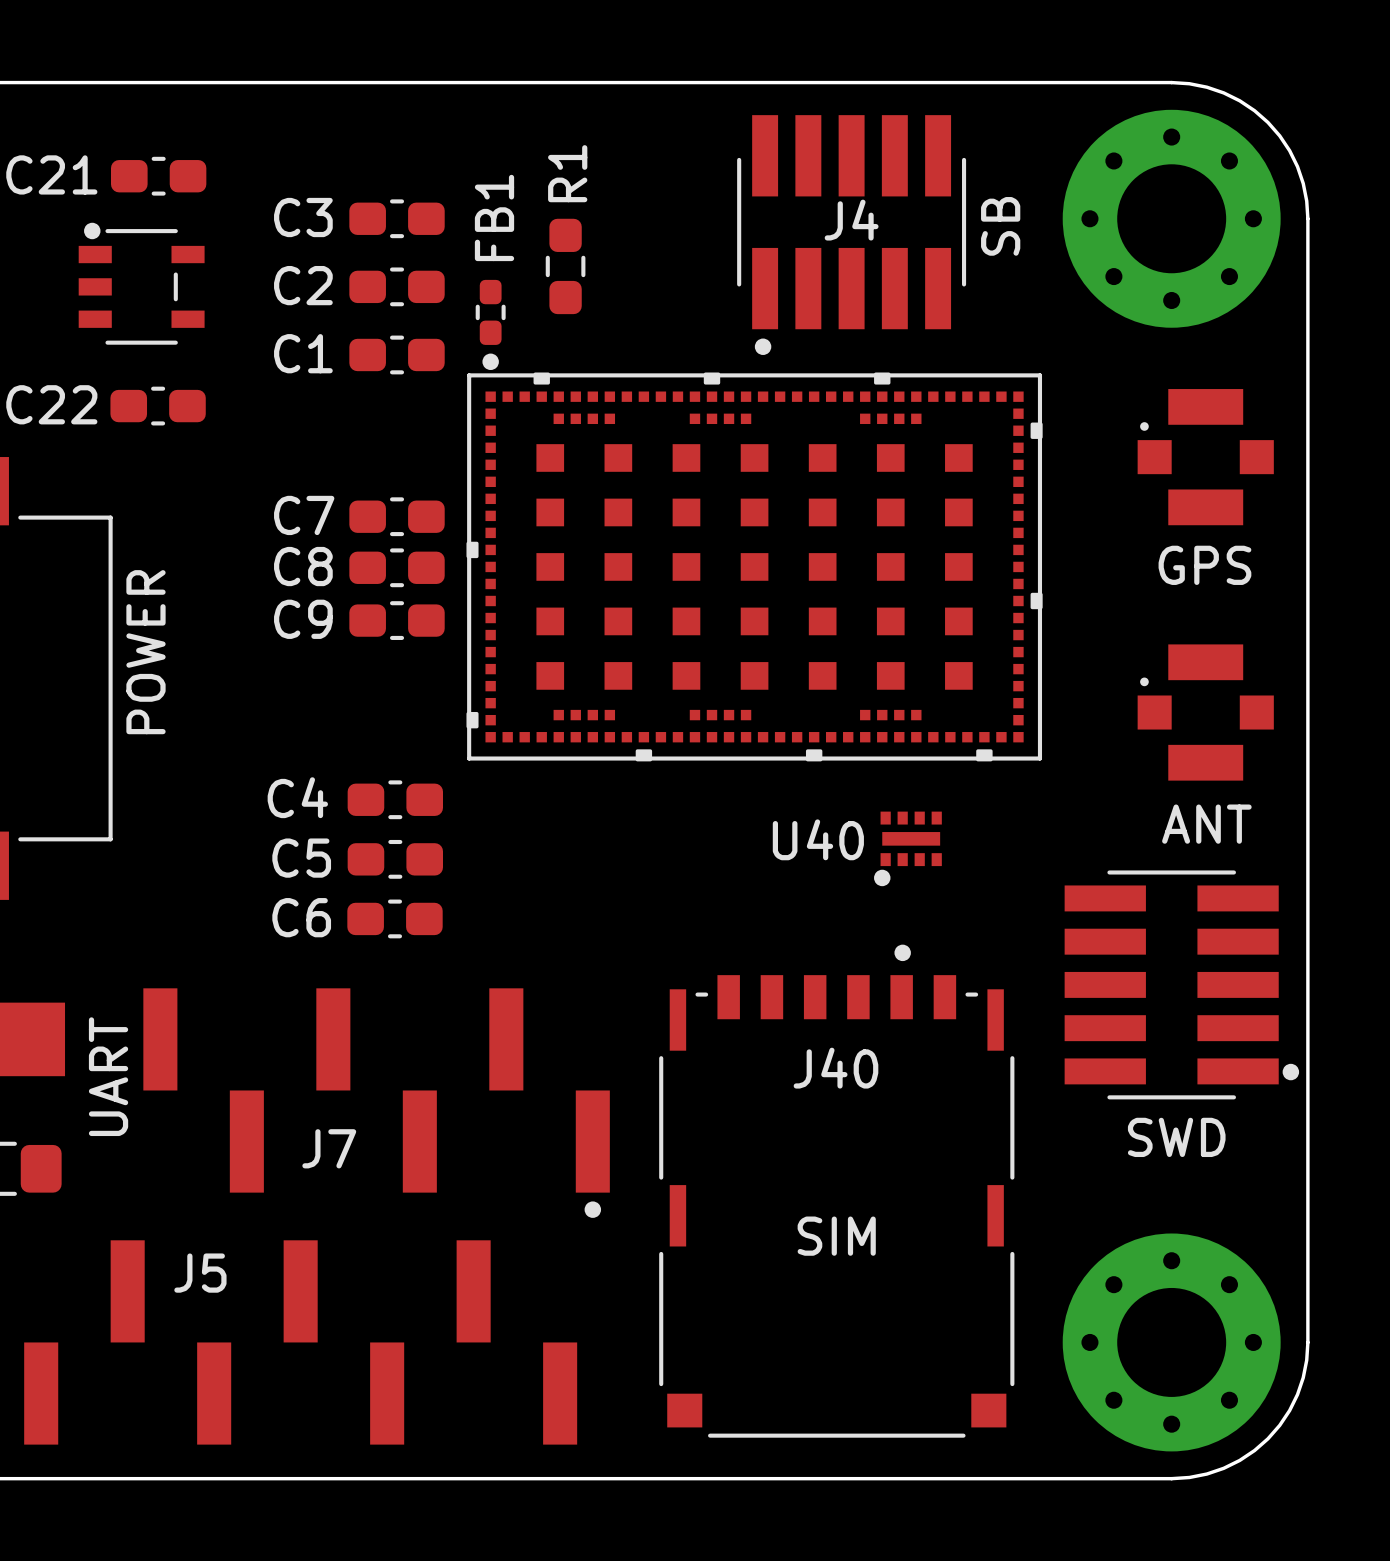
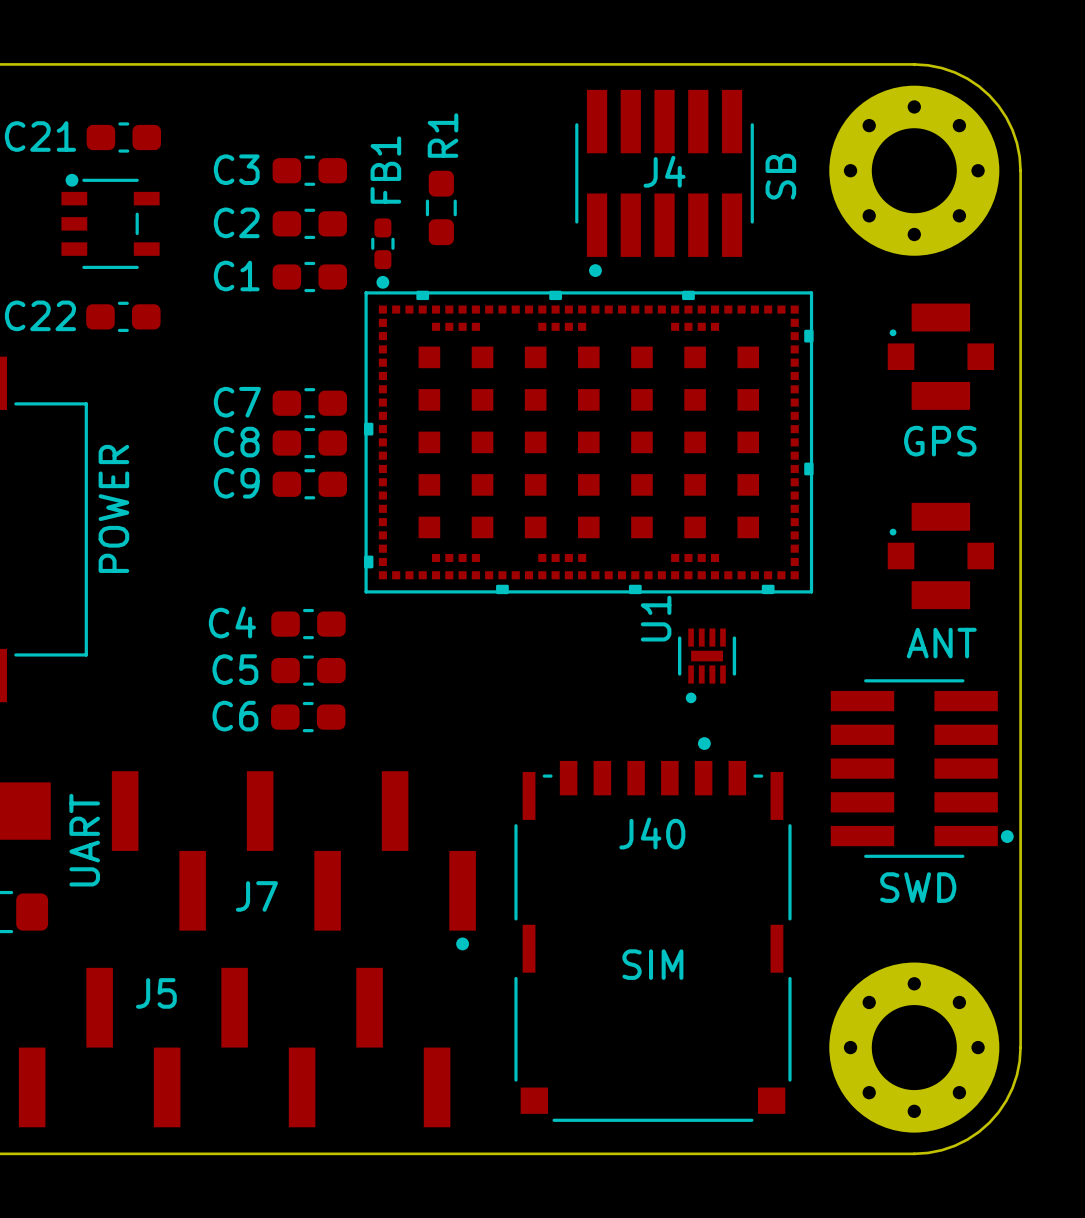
U40: (911, 838) -> none
U1: none -> (707, 665)
drawing: [874, 869, 891, 887] -> none

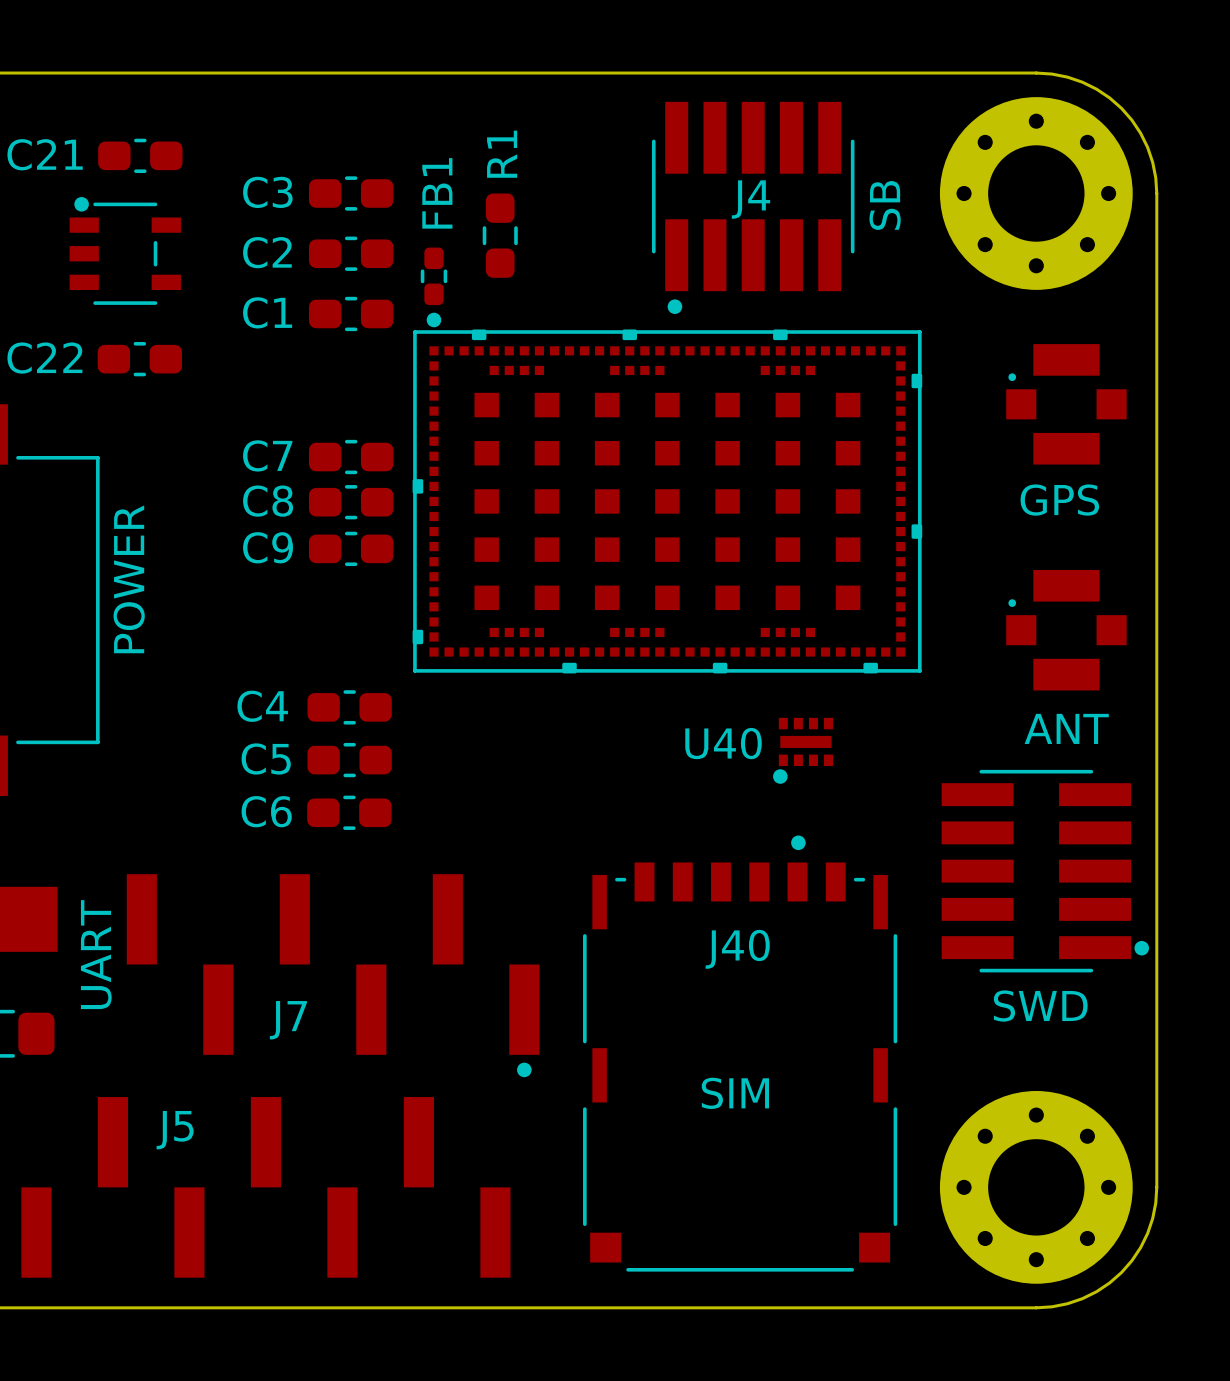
U40: none -> (805, 741)
U1: (707, 665) -> none
drawing: none -> [773, 769, 788, 784]

